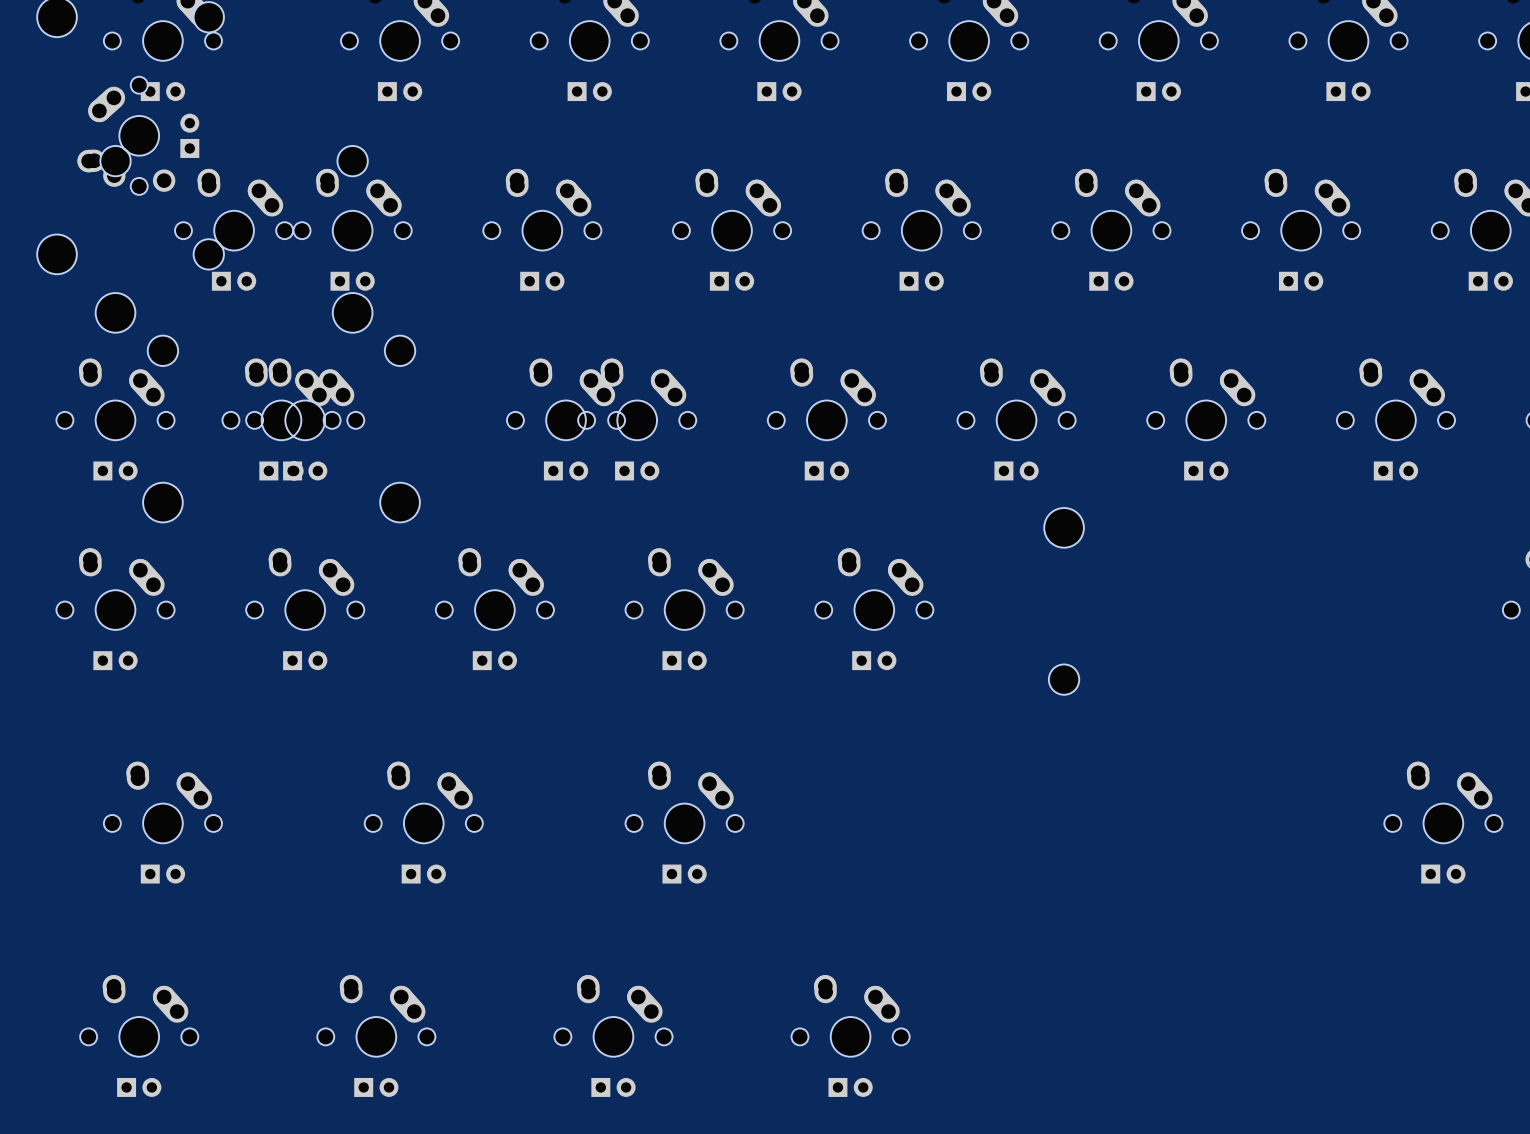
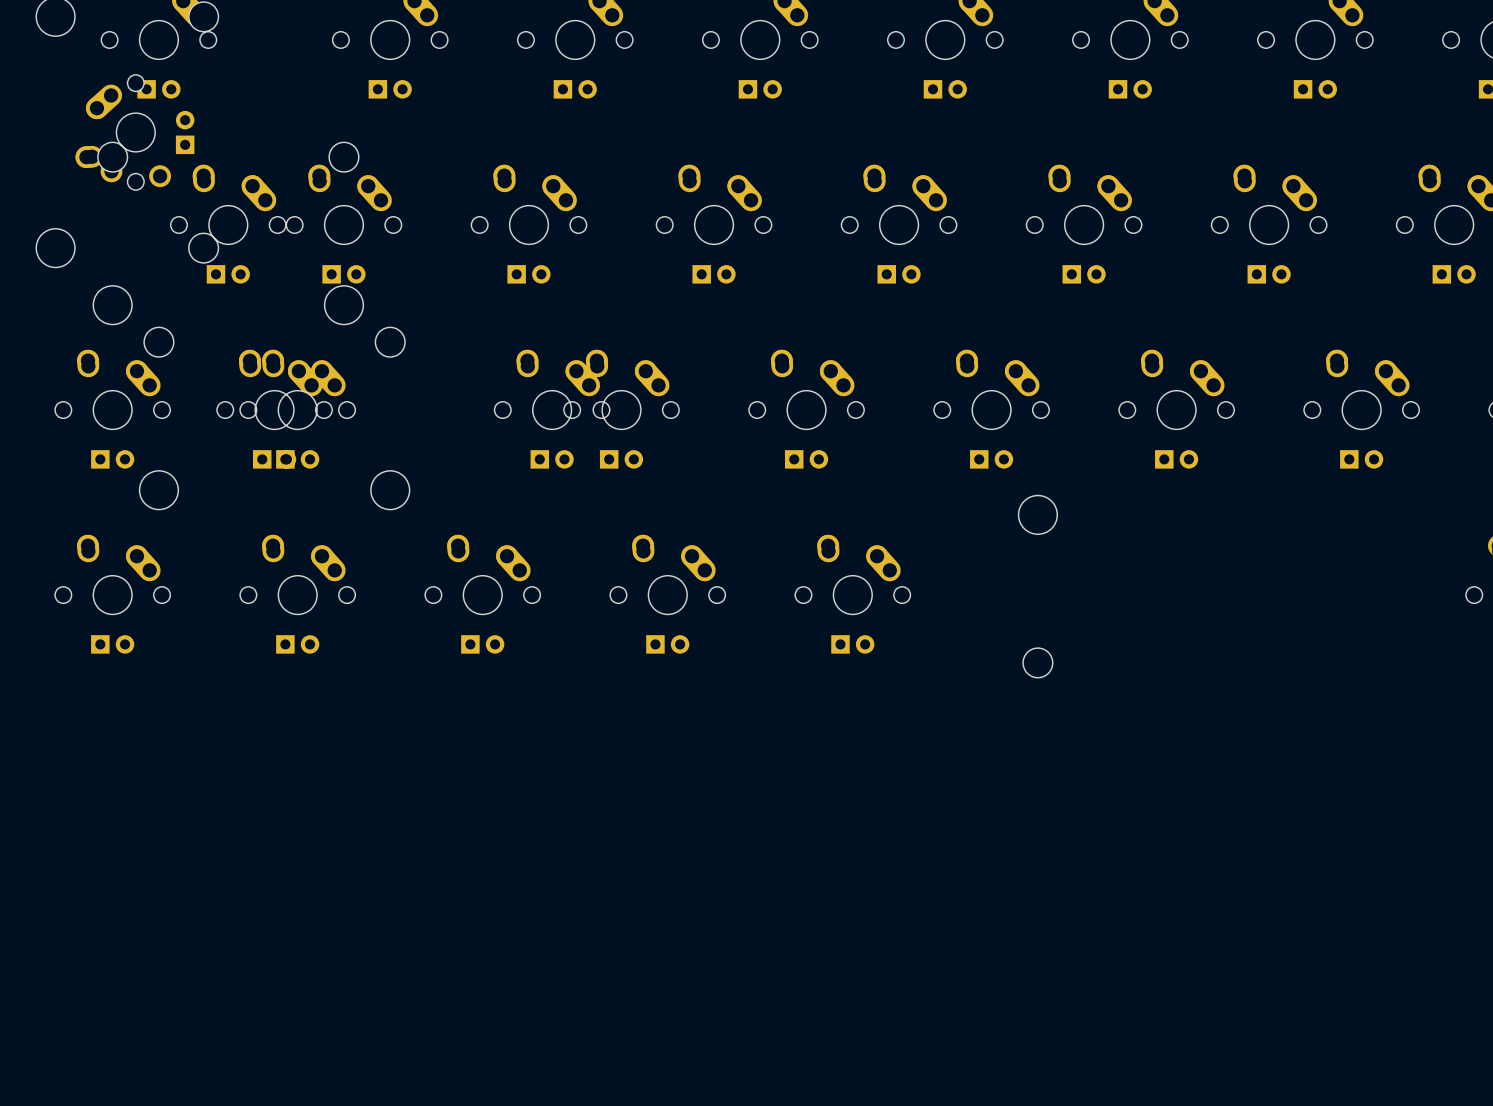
part: (162, 822) -> none
part: (423, 822) -> none
part: (684, 822) -> none
part: (1443, 822) -> none
part: (139, 1036) -> none
part: (376, 1036) -> none
part: (613, 1036) -> none
part: (850, 1036) -> none

